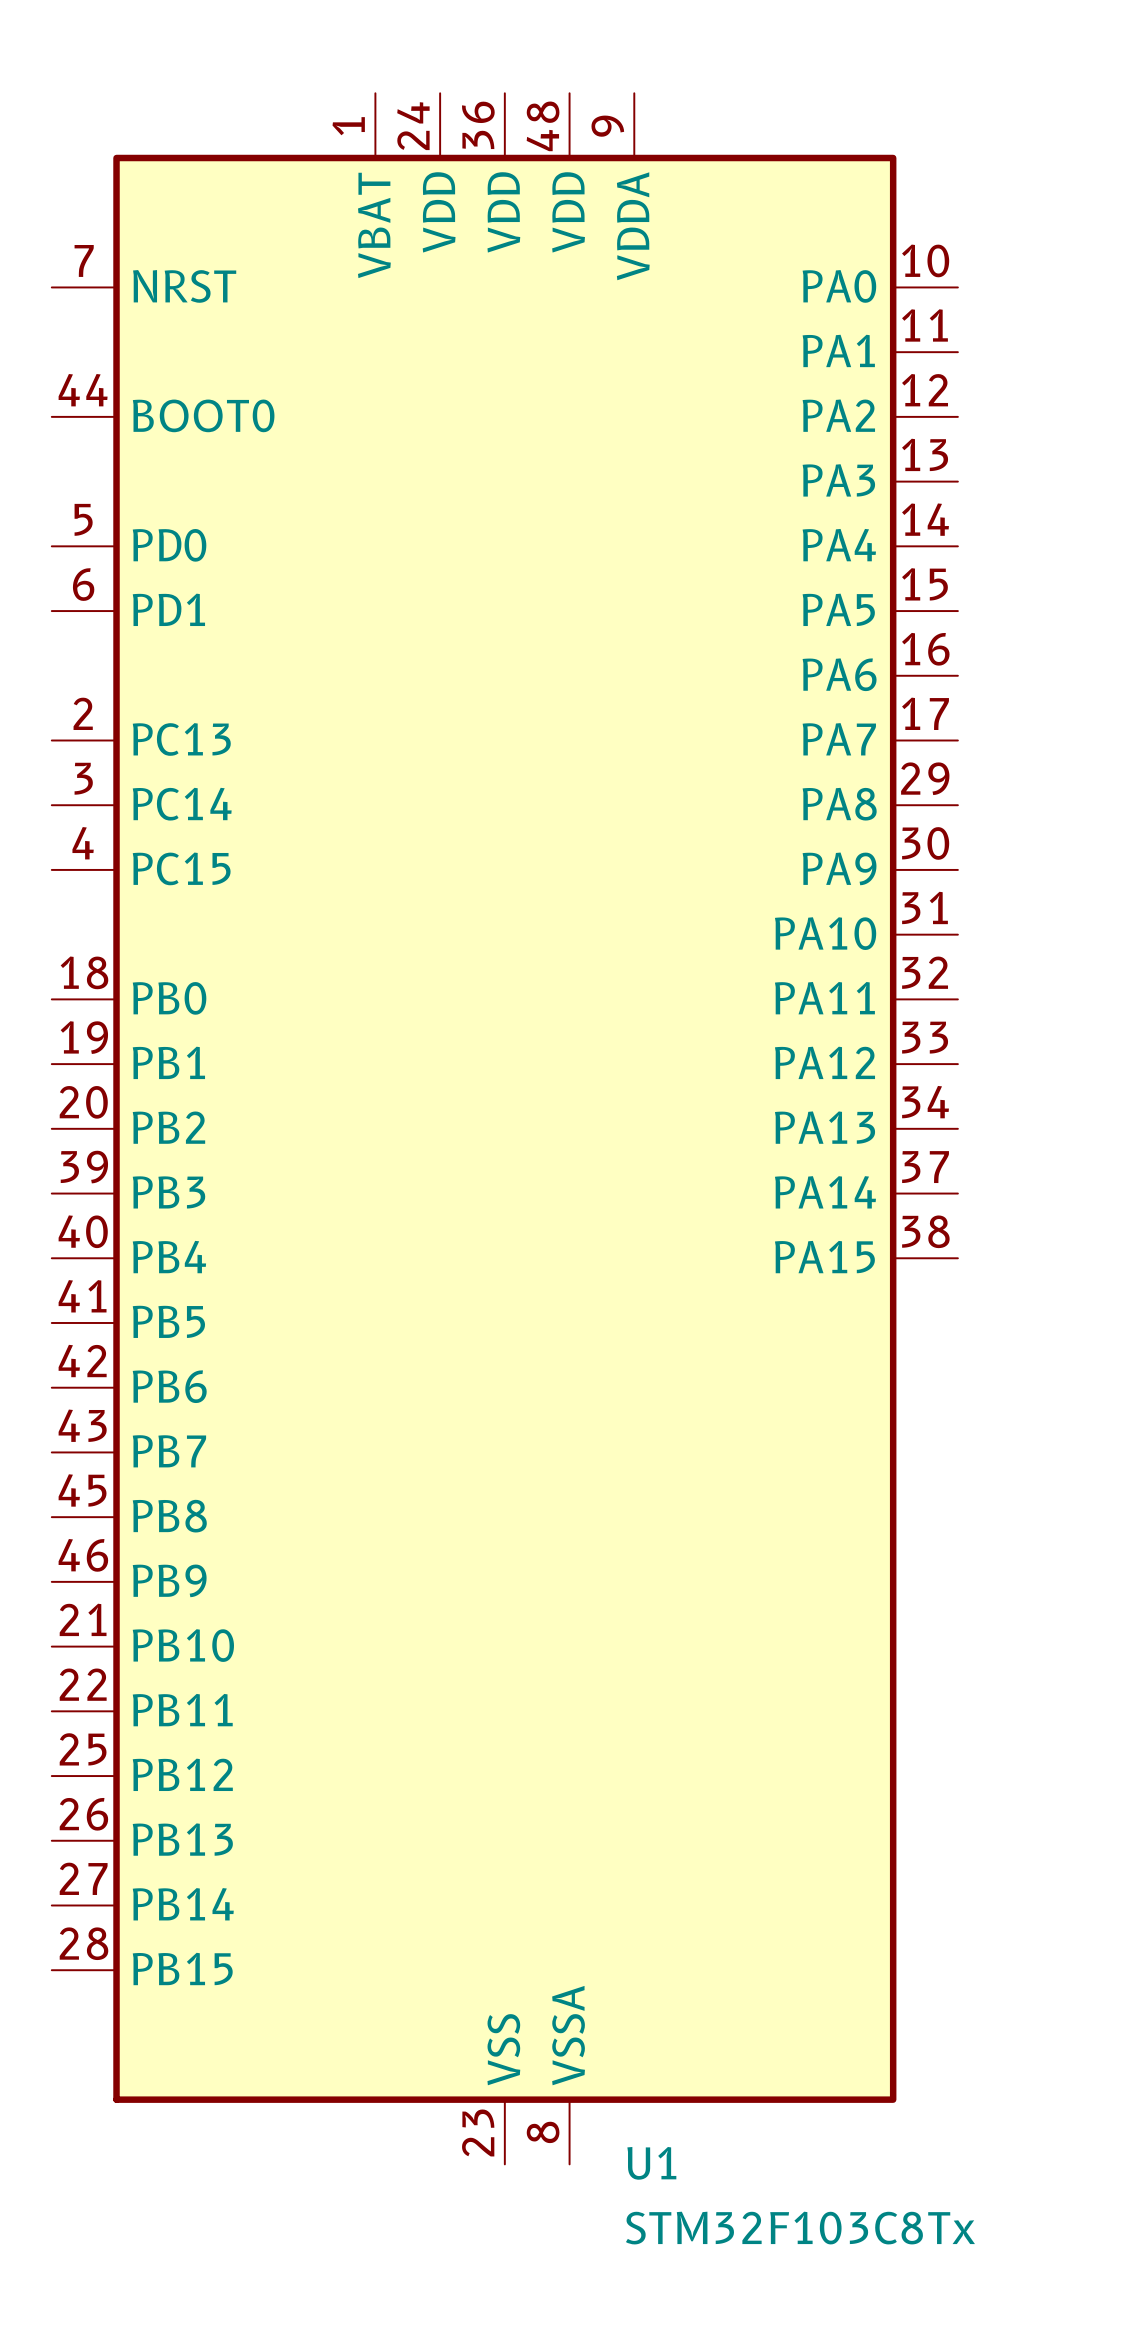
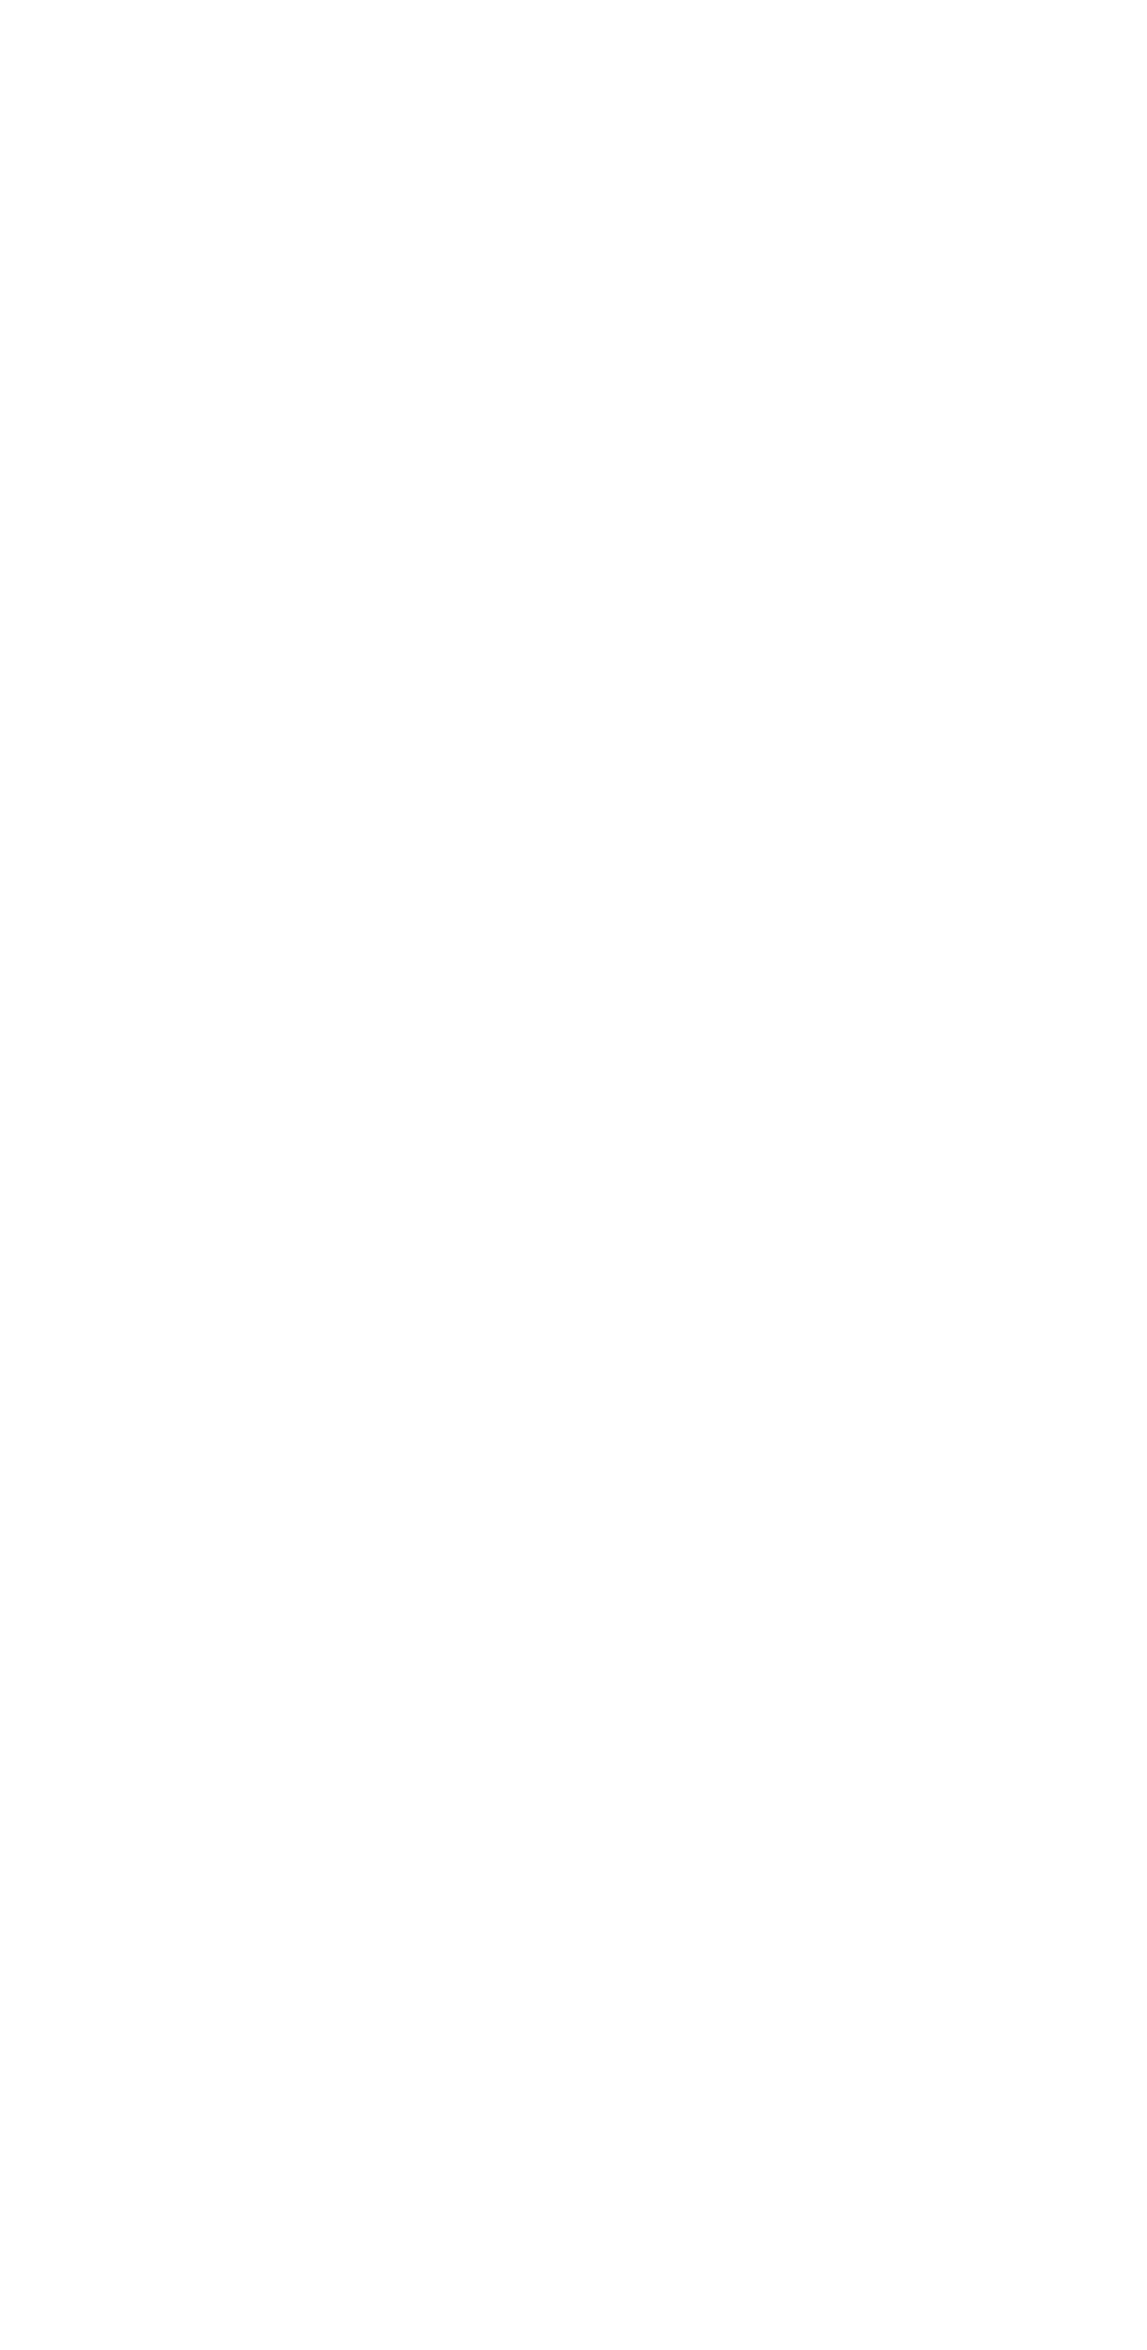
U1: STM32F103C8Tx (504, 1128) -> none

